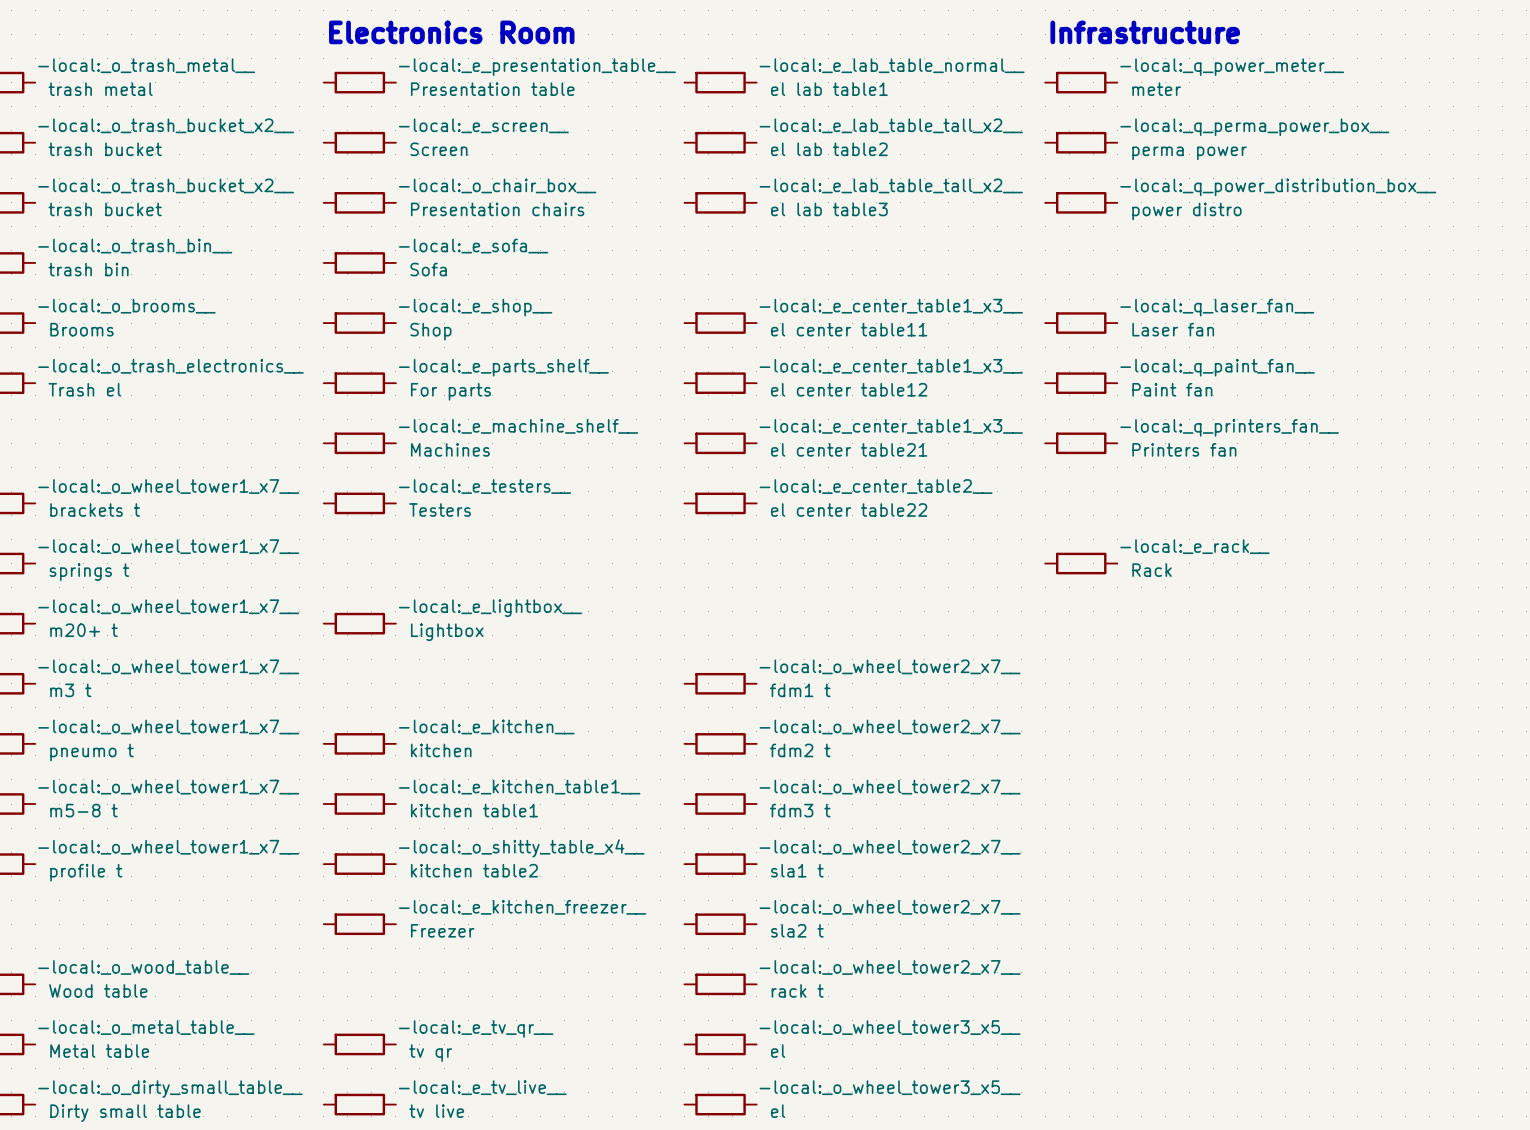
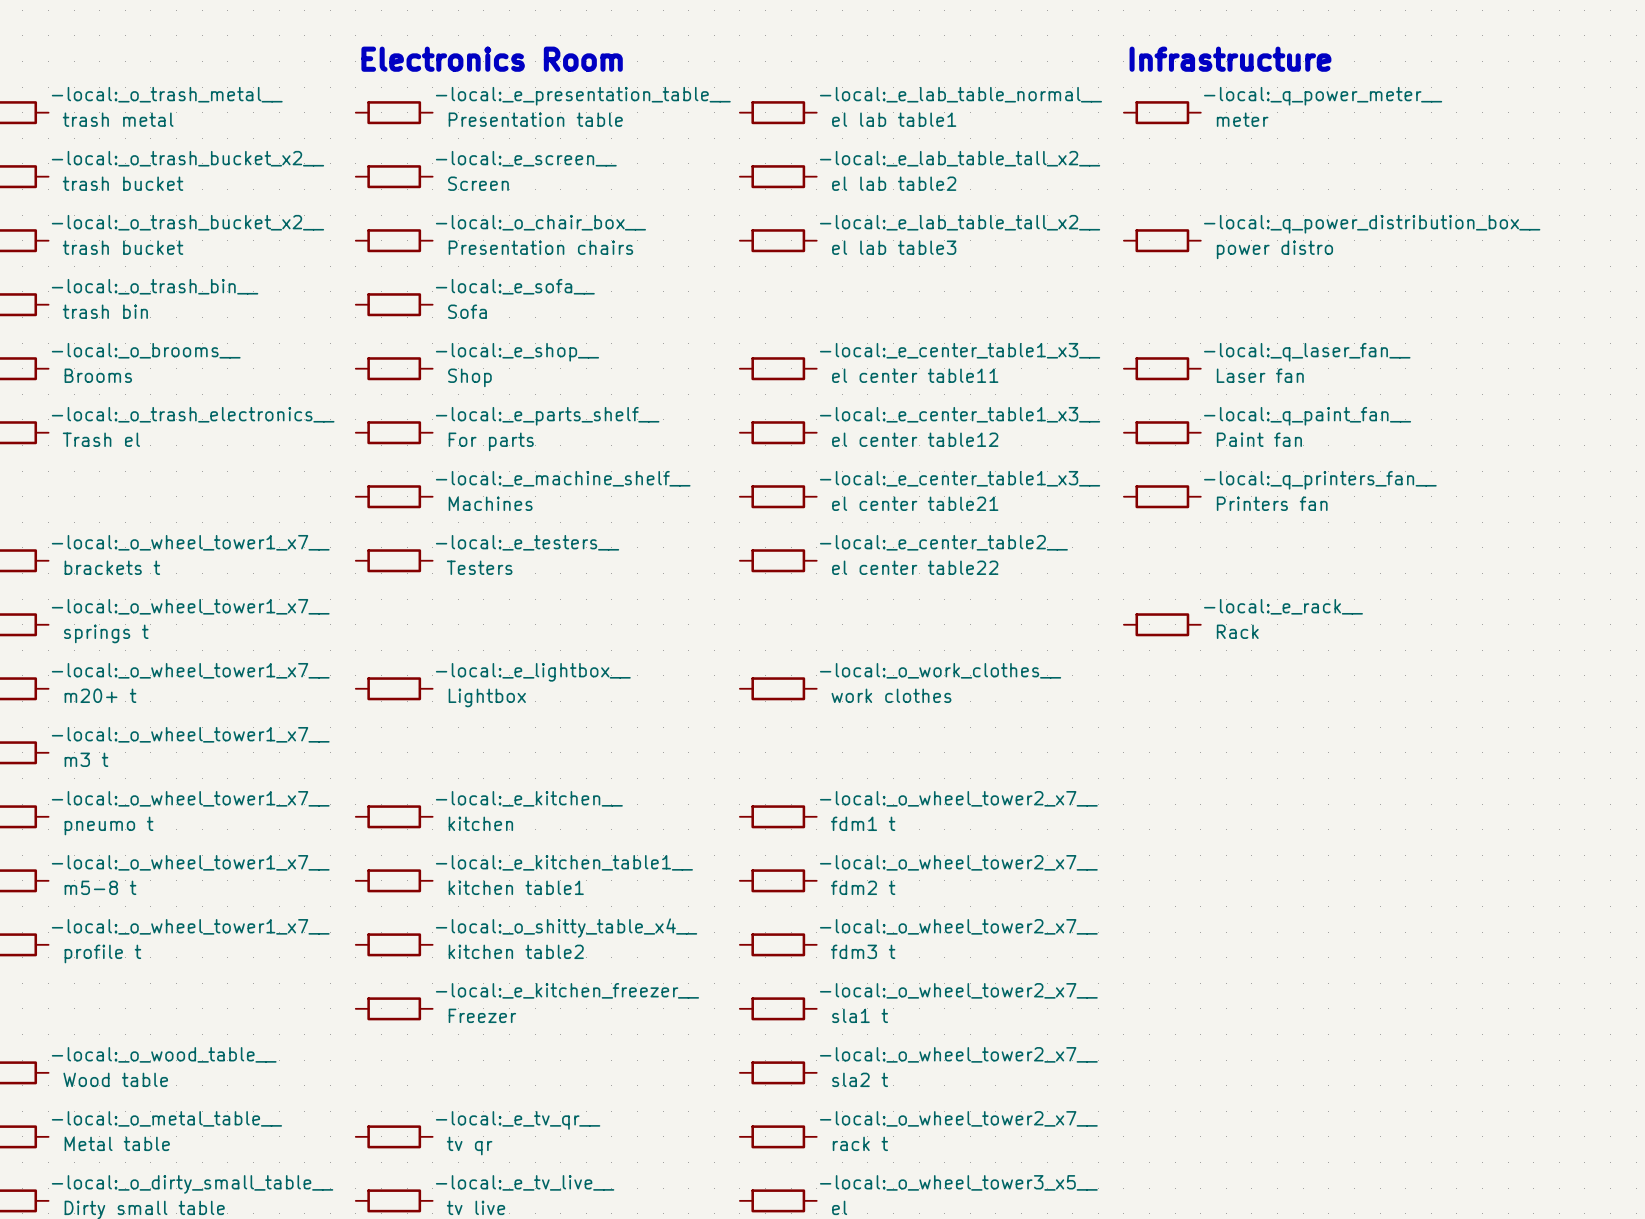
part: perma power (1081, 142) -> none
part: none -> work clothes (778, 688)
part: fdm1 t (720, 683) -> none
part value: fdm2 t (800, 750) -> fdm1 t (863, 823)
part value: fdm3 t (800, 810) -> fdm2 t (863, 887)
part value: sla1 t (797, 870) -> fdm3 t (863, 951)
part value: sla2 t (797, 930) -> sla1 t (860, 1015)
part value: rack t (797, 990) -> sla2 t (860, 1079)
part text: -local:_o_wheel_tower3_x5__ (890, 1027) -> -local:_o_wheel_tower2_x7__ (958, 1118)
part value: el (778, 1051) -> rack t (860, 1143)

